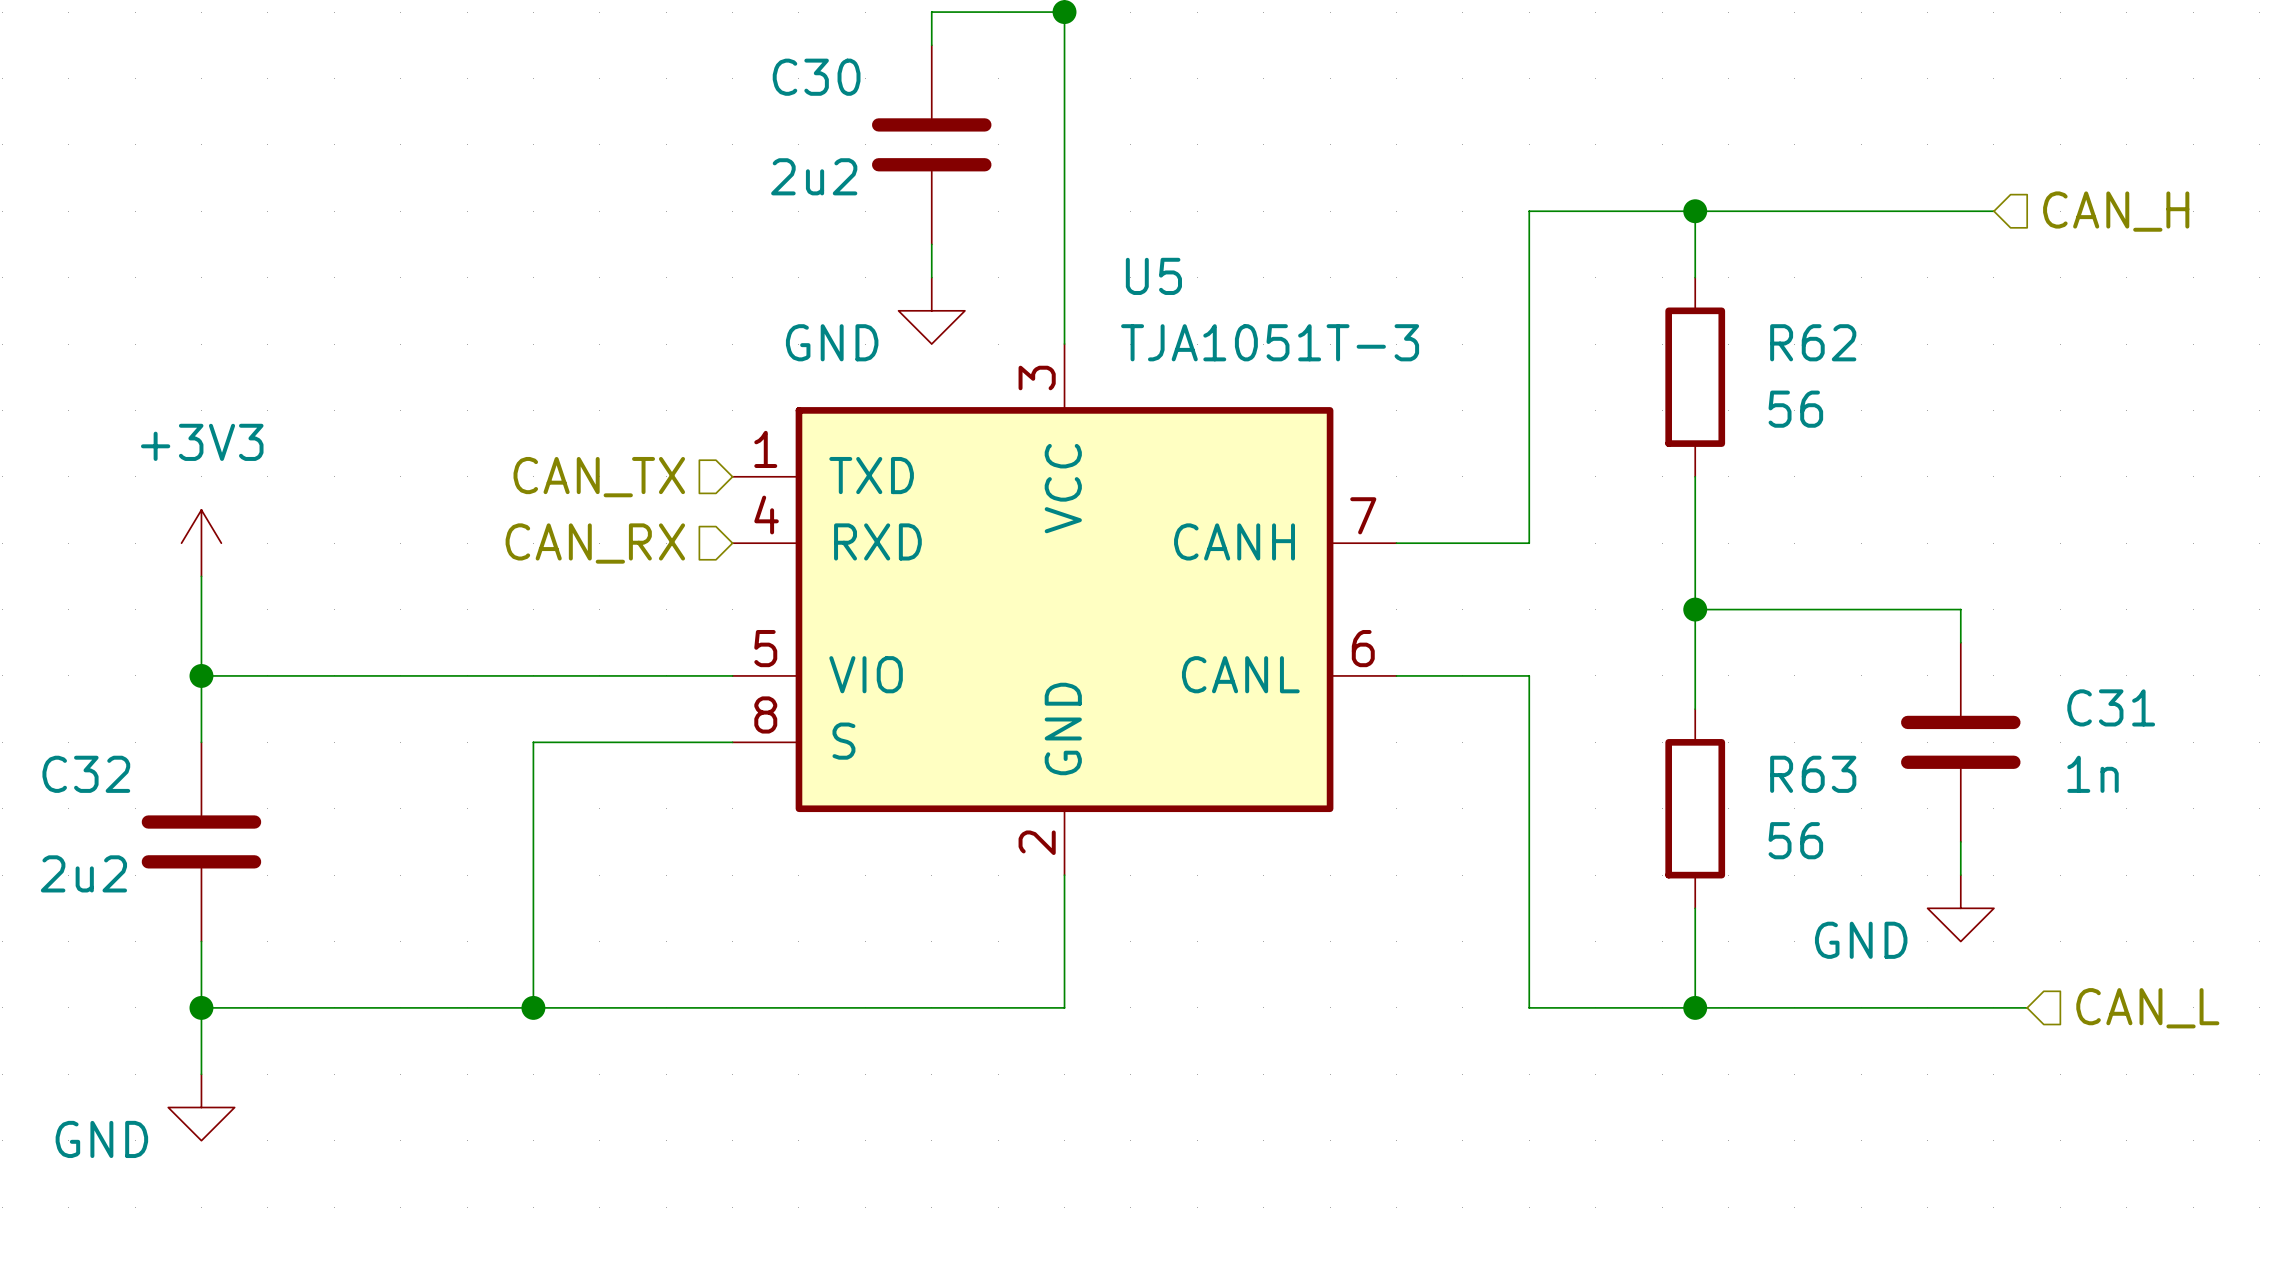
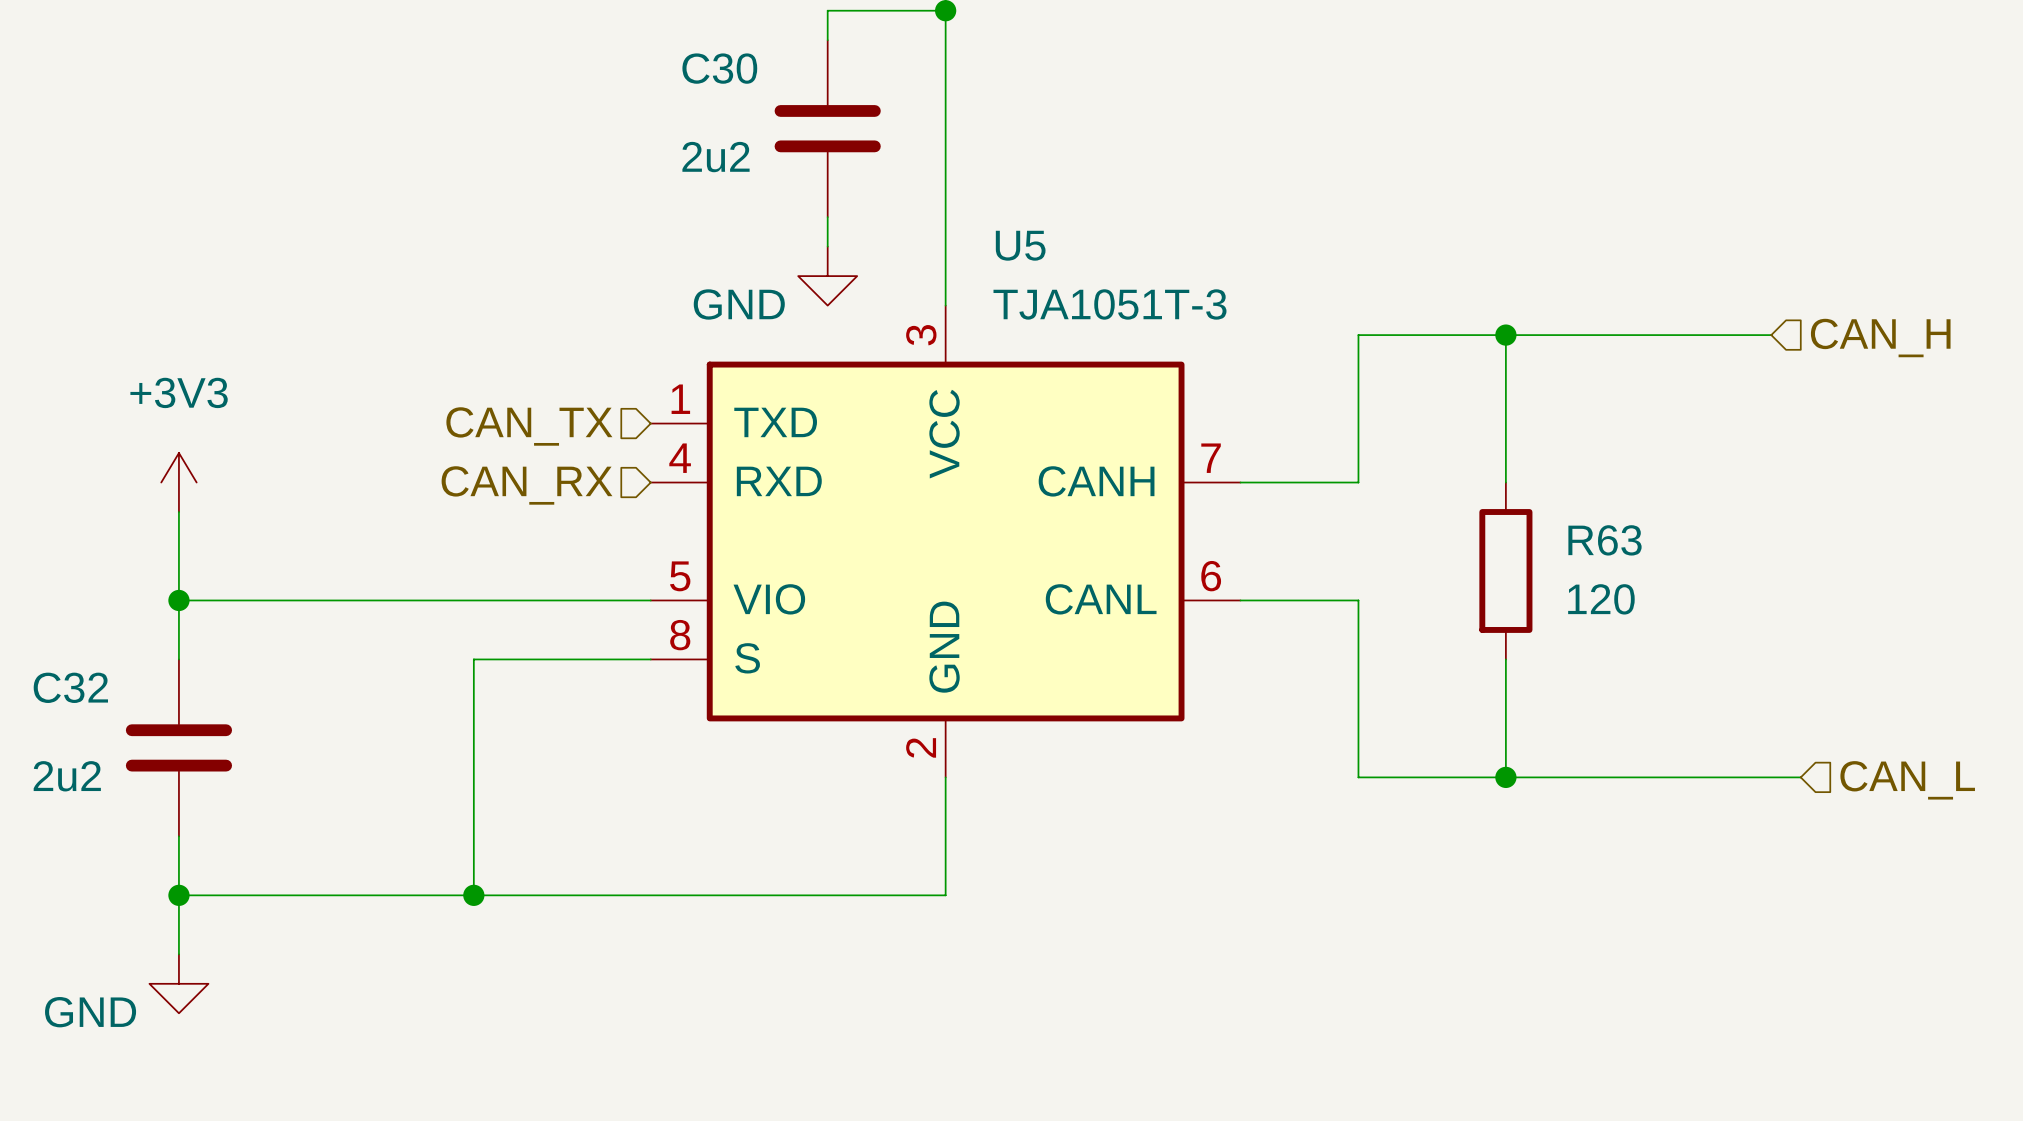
wire: (1695, 211) (1695, 277) -> none
junction: (1695, 211) -> none
wire: (1993, 211) (1529, 211) (1529, 377) -> (1771, 335) (1358, 335)
hierarchical label position: CAN_H (2116, 211) -> CAN_H (1880, 338)
junction: none -> (1505, 335)
R62: 56 (1695, 377) -> none
wire: (1695, 543) (1695, 709) -> none
wire: (1695, 609) (1960, 609) (1960, 642) -> none
junction: (1695, 609) -> none
wire: none -> (1505, 659) (1505, 777)
C31: 1n (1960, 742) -> none
R63 position: (1695, 808) -> (1505, 570)
R63 value: 56 (1795, 840) -> 120 (1601, 599)
wire: (1960, 841) (1960, 875) -> none
wire: (1529, 875) (1529, 1007) (2027, 1007) -> (1358, 777) (1800, 777)
junction: none -> (1505, 777)
wire: (1695, 908) (1695, 1007) -> (1505, 335) (1505, 423)
power symbol: GND (1960, 908) -> none
junction: (1695, 1007) -> none
hierarchical label position: CAN_L (2147, 1008) -> CAN_L (1907, 780)

